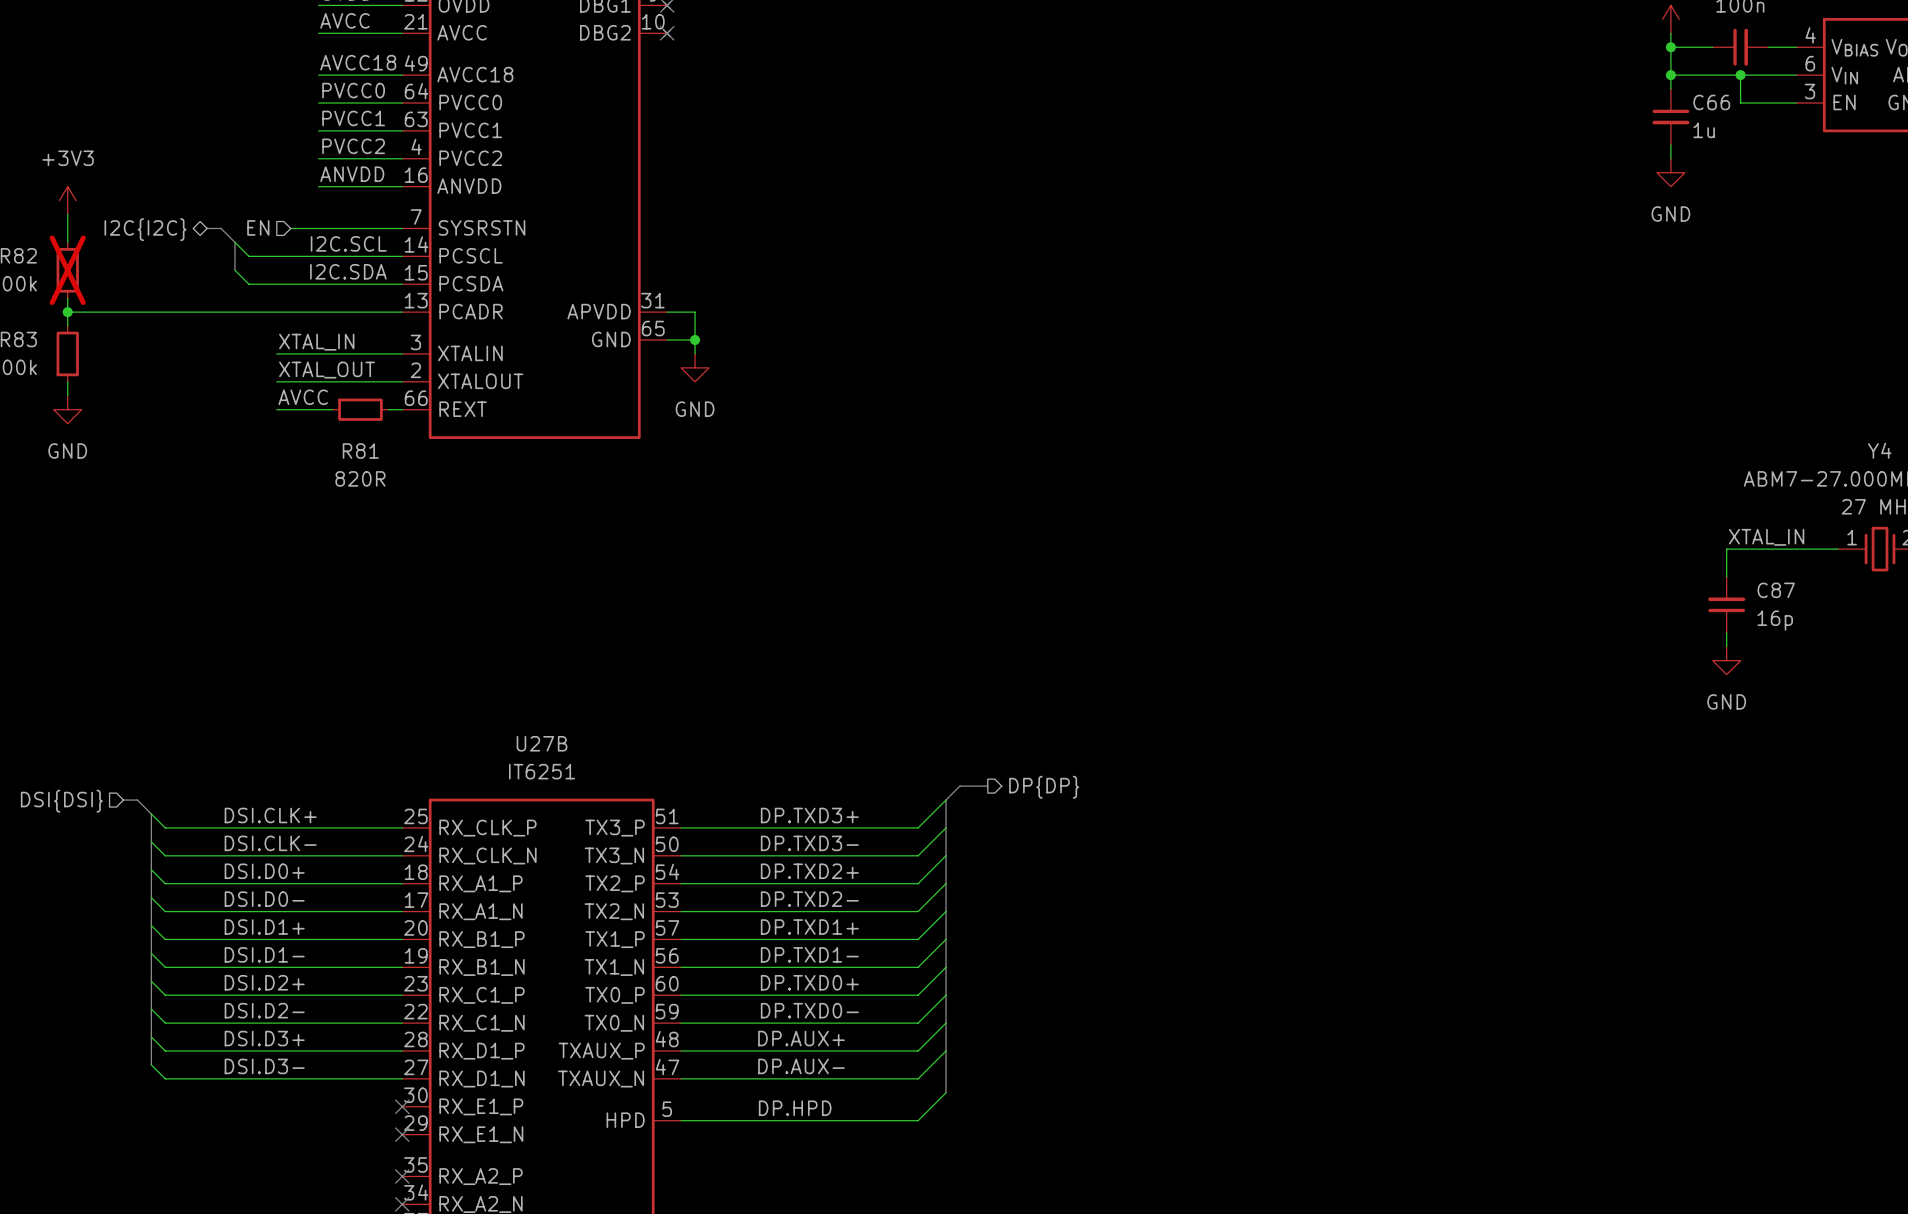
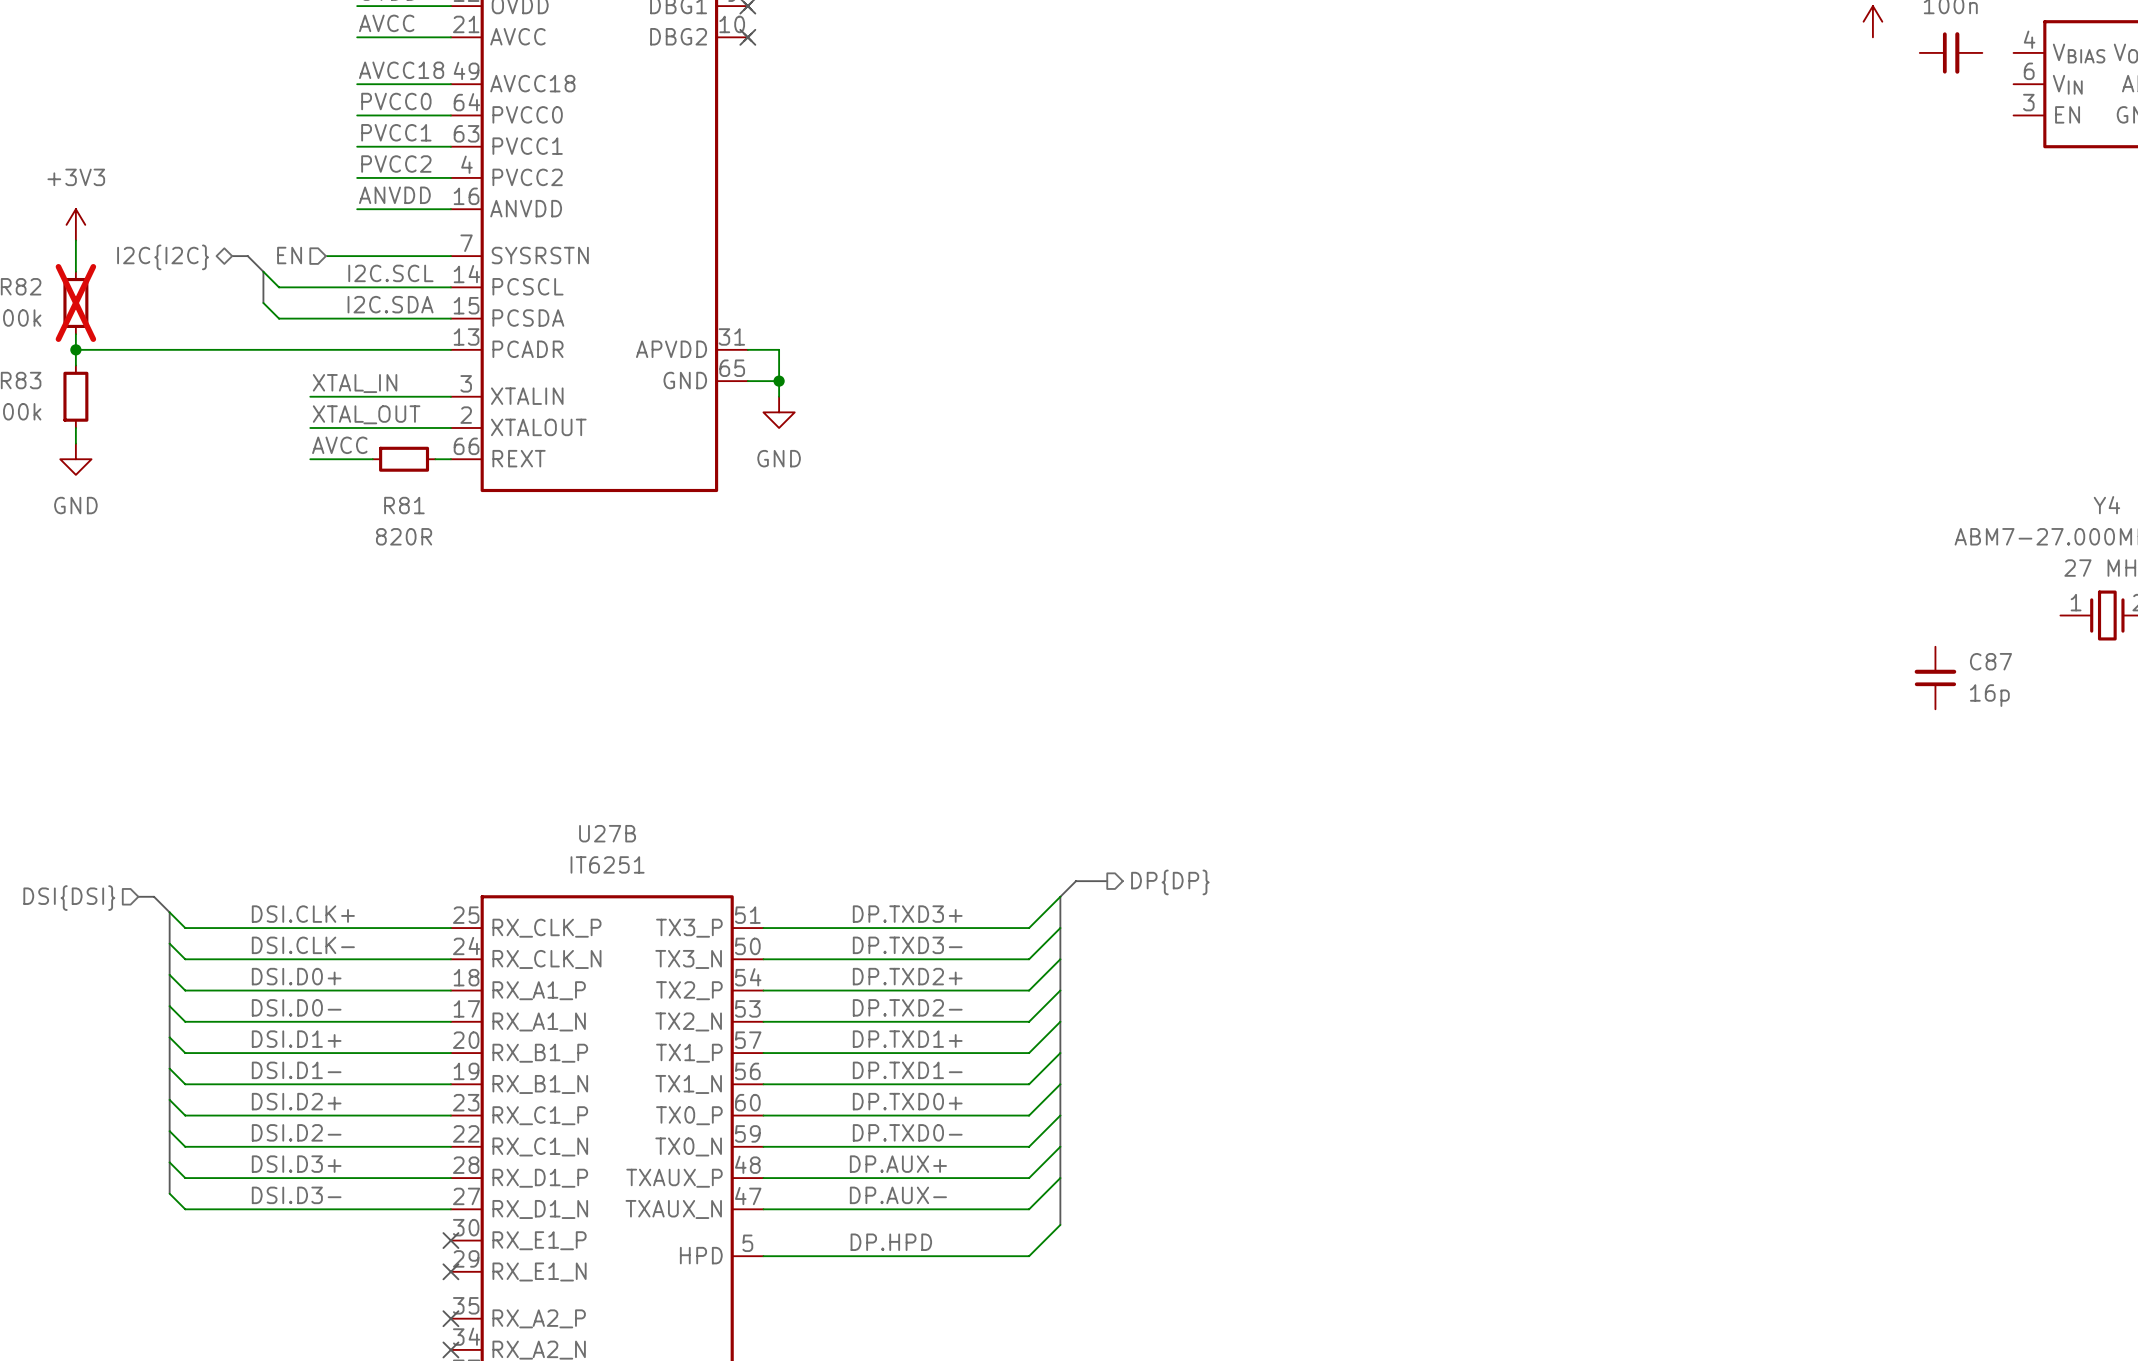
wire: (1670, 33) (1670, 89) -> none
wire: (1670, 47) (1712, 47) -> none
junction: (1670, 47) -> none
wire: (1768, 47) (1796, 47) -> none
wire: (1670, 75) (1796, 75) -> none
junction: (1670, 75) -> none
wire: (1740, 75) (1740, 103) (1796, 103) -> none
junction: (1740, 75) -> none
C66: (1670, 116) -> none
wire: (1670, 144) (1670, 158) -> none
power symbol: GND (1670, 172) -> none
label: XTAL_IN (1766, 537) -> none
wire: (1838, 549) (1726, 549) (1726, 577) -> none
wire: (1726, 632) (1726, 646) -> none
power symbol: GND (1726, 660) -> none

